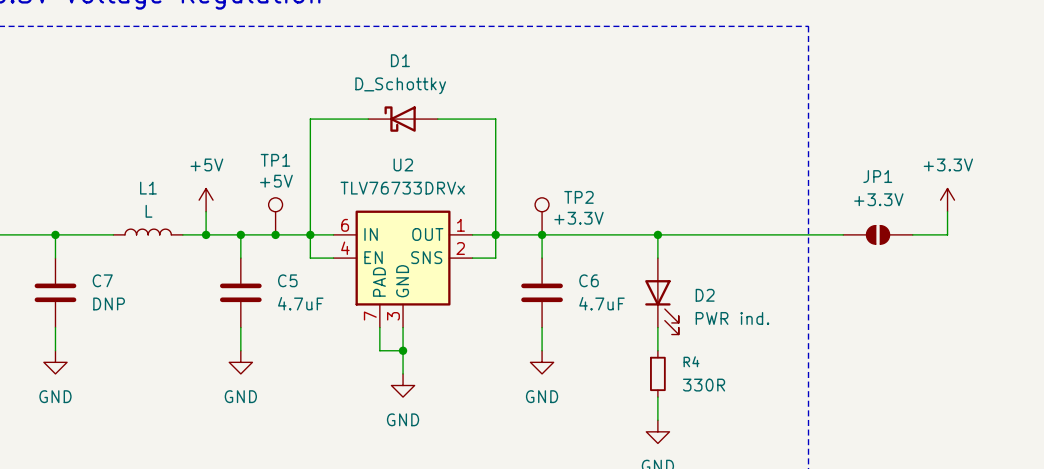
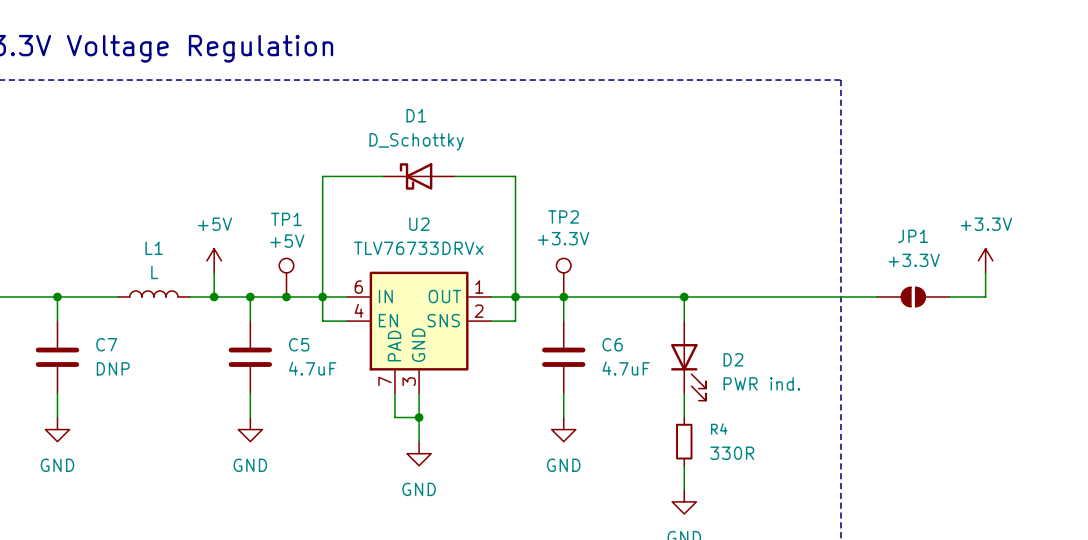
TP2 name position: TP2 (578, 197) -> TP2 (563, 216)
TP2 value position: +3.3V (578, 218) -> +3.3V (563, 238)

